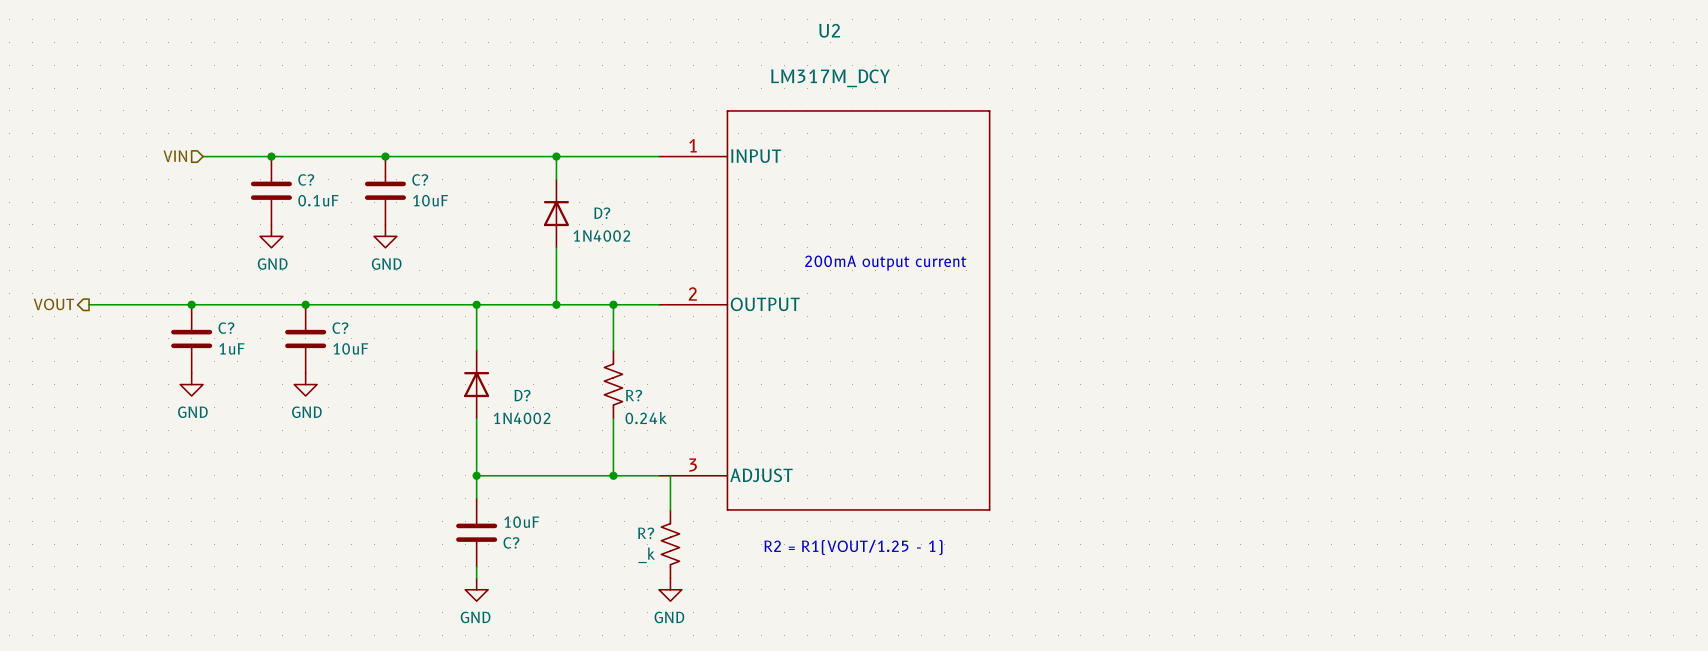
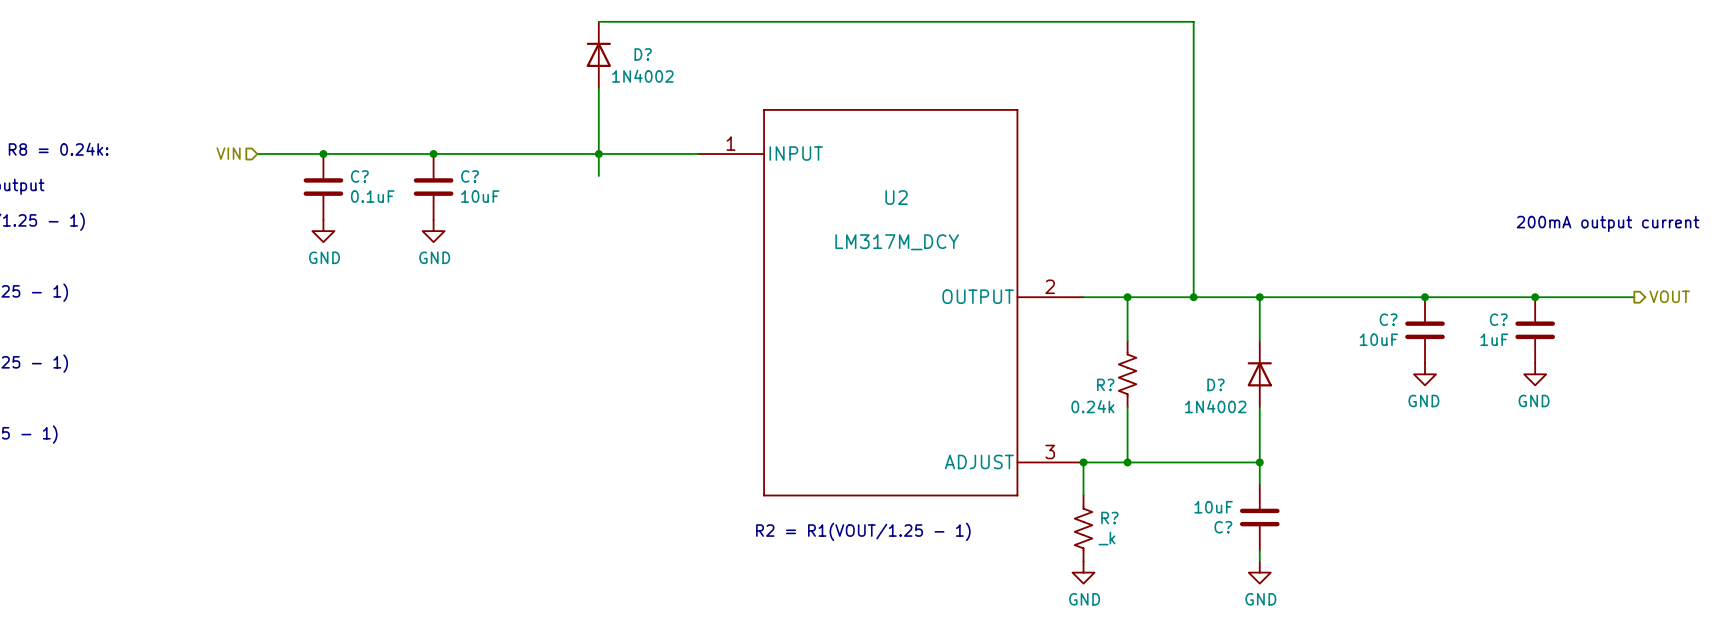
wire: none -> (598, 21) (1193, 21) (1193, 297)
U2 name position: U2 (829, 30) -> U2 (896, 197)
U2 value position: LM317M_DCY (830, 78) -> LM317M_DCY (897, 242)
wire: none -> (598, 87) (598, 154)
U2 symbol: [659, 110, 991, 511] -> [697, 109, 1084, 497]
D? position: (556, 213) -> (598, 54)
text: none -> 200mA output current (1608, 223)
wire: (556, 247) (556, 304) -> none
text: 200mA output current (885, 263) -> none
hierarchical label: VOUT (53, 304) -> none
wire: (89, 304) (659, 304) -> none
junction: (191, 304) -> none
junction: (305, 304) -> none
wire: (476, 304) (476, 350) -> none
junction: (476, 304) -> none
junction: (556, 304) -> none
wire: (613, 304) (613, 350) -> none
junction: (613, 304) -> none
wire: none -> (1083, 297) (1634, 297)
wire: none -> (1127, 297) (1127, 341)
junction: none -> (1127, 297)
junction: none -> (1193, 297)
wire: none -> (1259, 297) (1259, 341)
junction: none -> (1259, 297)
junction: none -> (1425, 297)
junction: none -> (1535, 297)
hierarchical label: none -> VOUT (1669, 296)
C?: 1uF (191, 338) -> none
C?: 10uF (305, 338) -> none
C?: none -> 10uF (1425, 330)
C?: none -> 1uF (1535, 330)
power symbol: GND (191, 384) -> none
power symbol: GND (305, 384) -> none
D?: 1N4002 (476, 384) -> none
R?: 0.24k (613, 384) -> none
R?: none -> 0.24k (1127, 374)
D?: none -> 1N4002 (1259, 374)
power symbol: none -> GND (1425, 374)
power symbol: none -> GND (1535, 374)
wire: (476, 418) (476, 498) -> none
wire: (613, 418) (613, 475) -> none
wire: none -> (1127, 407) (1127, 462)
wire: none -> (1259, 407) (1259, 484)
wire: (476, 475) (659, 475) -> none
junction: (476, 475) -> none
junction: (613, 475) -> none
wire: (670, 475) (670, 509) -> none
junction: none -> (1083, 462)
junction: none -> (1127, 462)
wire: none -> (1259, 462) (1083, 462) (1083, 495)
junction: none -> (1259, 462)
C?: 10uF (476, 532) -> none
C?: none -> 10uF (1259, 517)
R?: _k (670, 544) -> none
R?: none -> _k (1083, 528)
wire: (476, 566) (476, 578) -> none
wire: none -> (1259, 550) (1259, 561)
power symbol: GND (476, 589) -> none
power symbol: GND (670, 589) -> none
power symbol: none -> GND (1083, 572)
power symbol: none -> GND (1259, 572)

